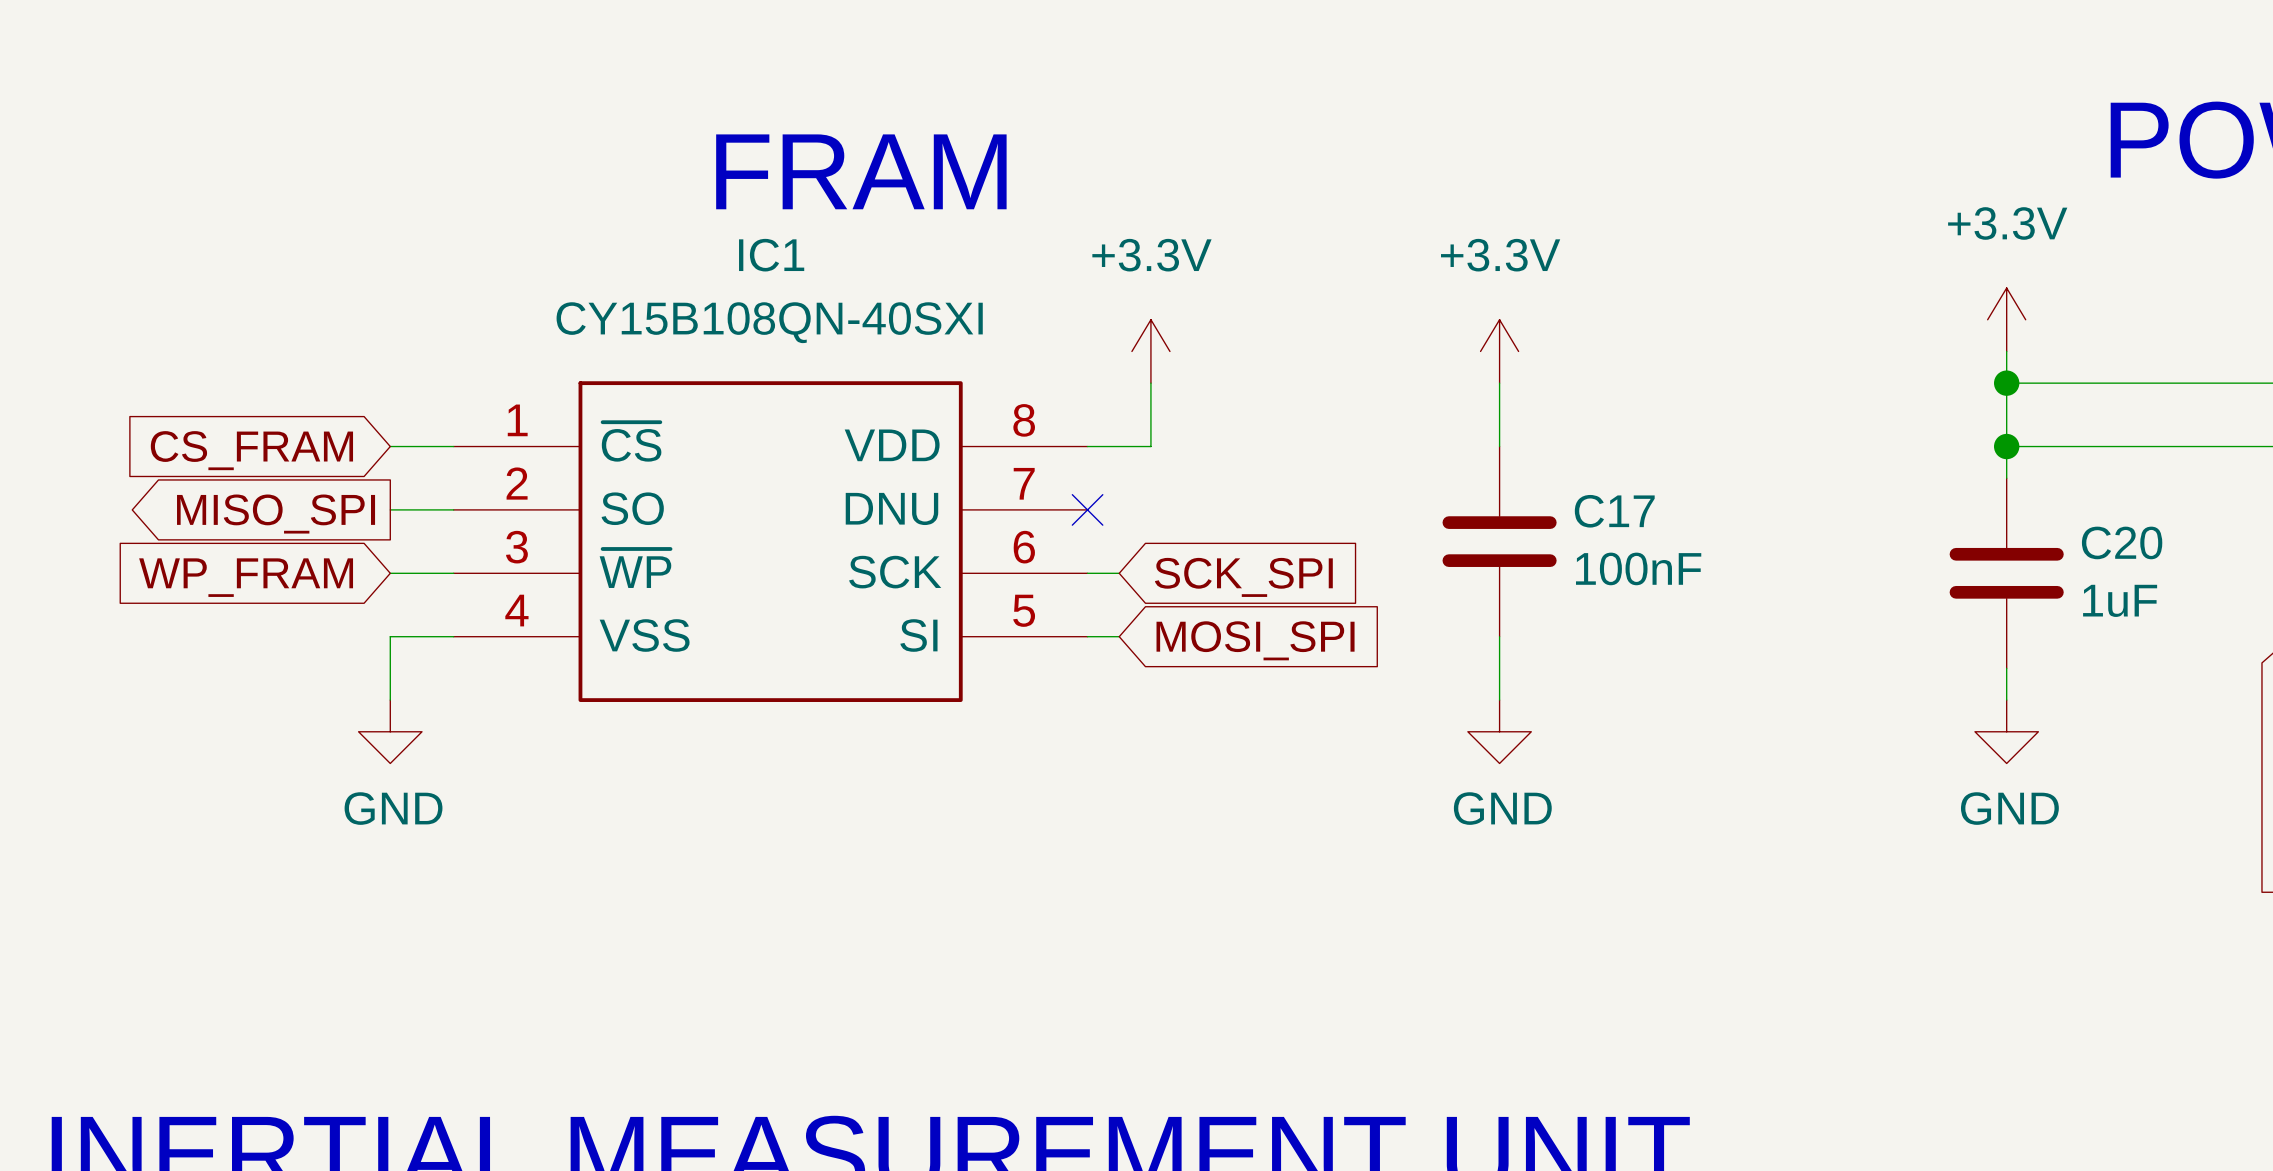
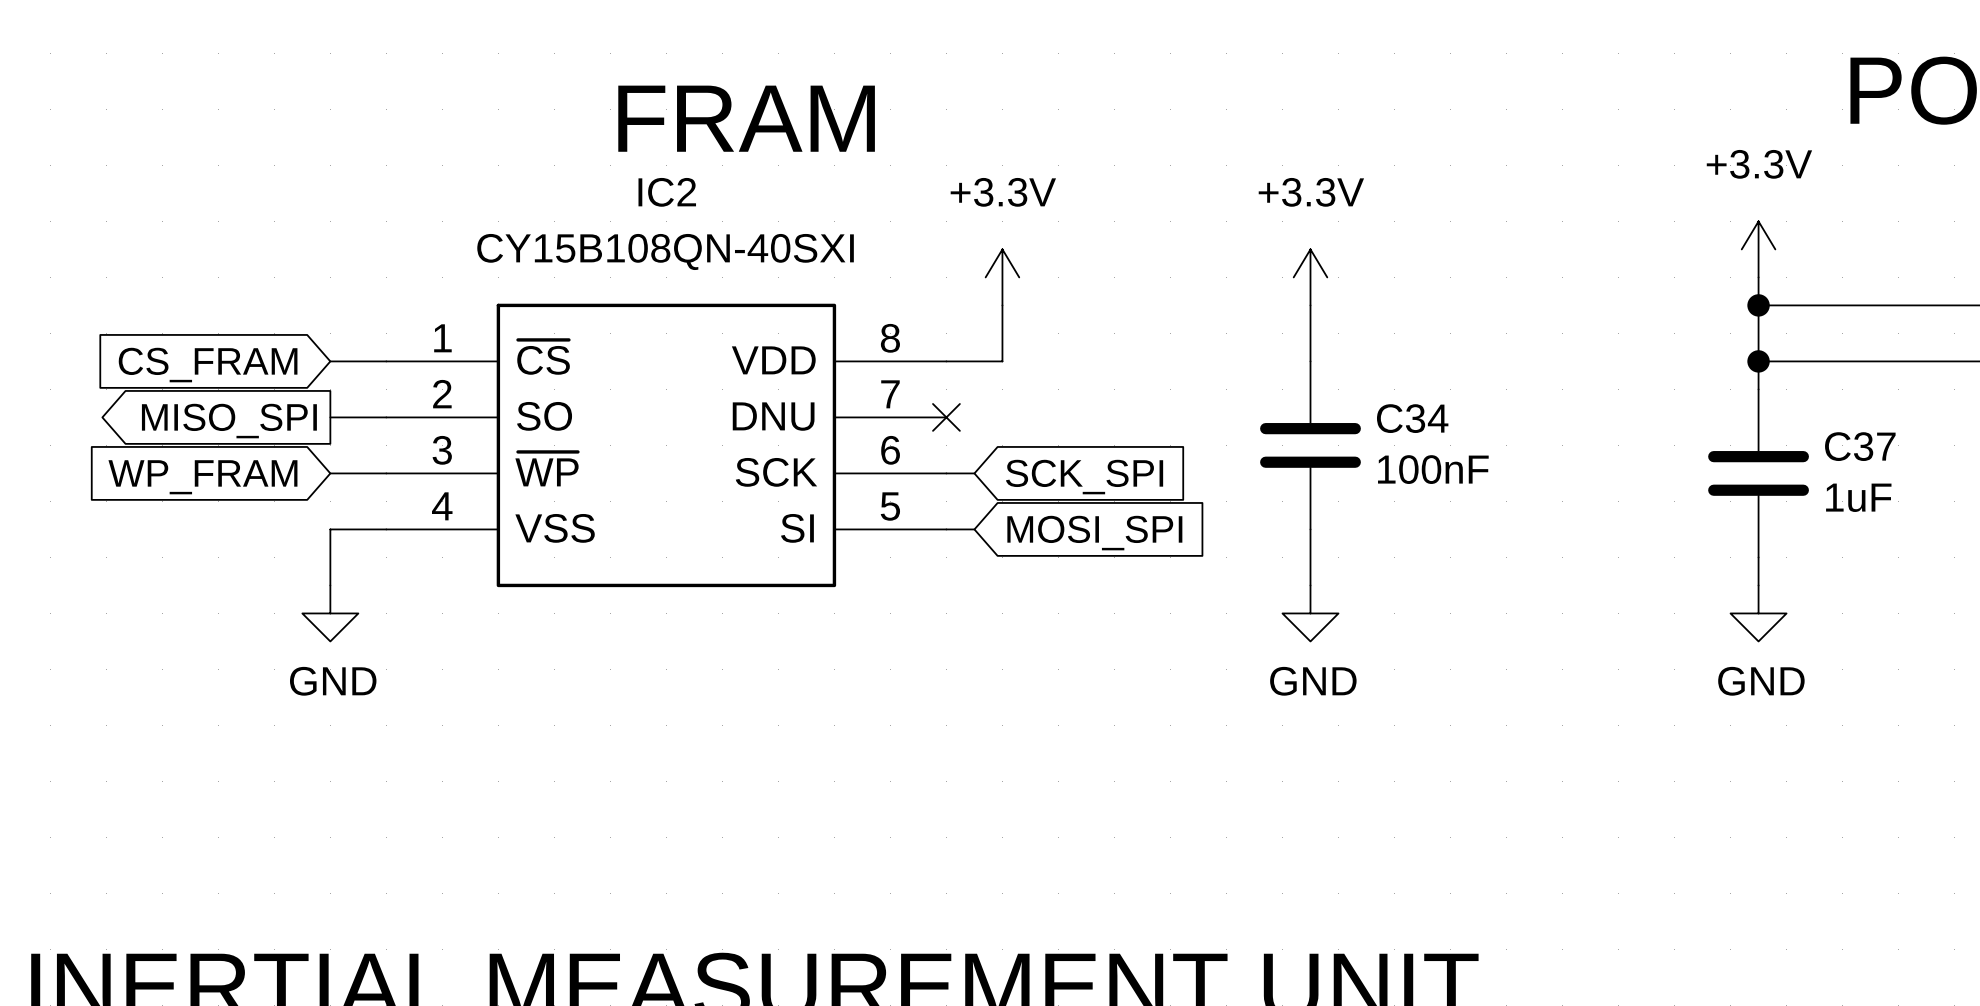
IC1 name: IC1 (771, 255) -> IC2 (667, 192)
C17 name: C17 (1614, 511) -> C34 (1412, 418)
C20 name: C20 (2122, 542) -> C37 (1860, 446)

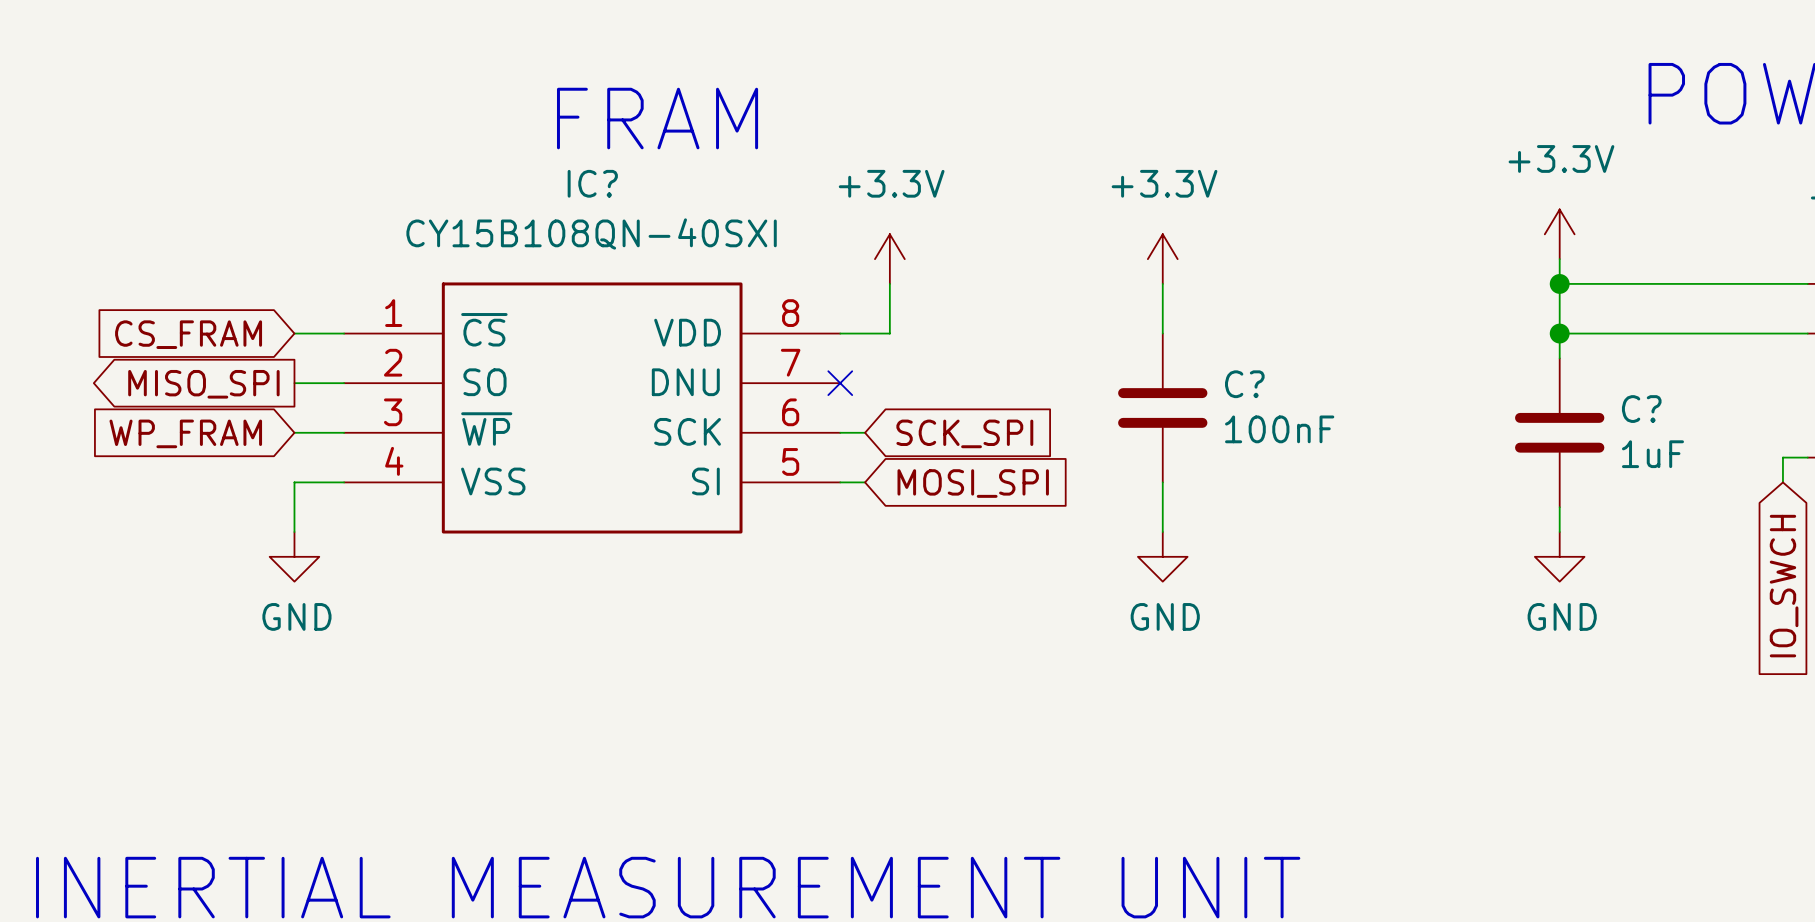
IC2 name: IC2 (667, 192) -> IC? (592, 183)
C34 name: C34 (1412, 418) -> C? (1244, 384)
C37 name: C37 (1860, 446) -> C? (1641, 409)

